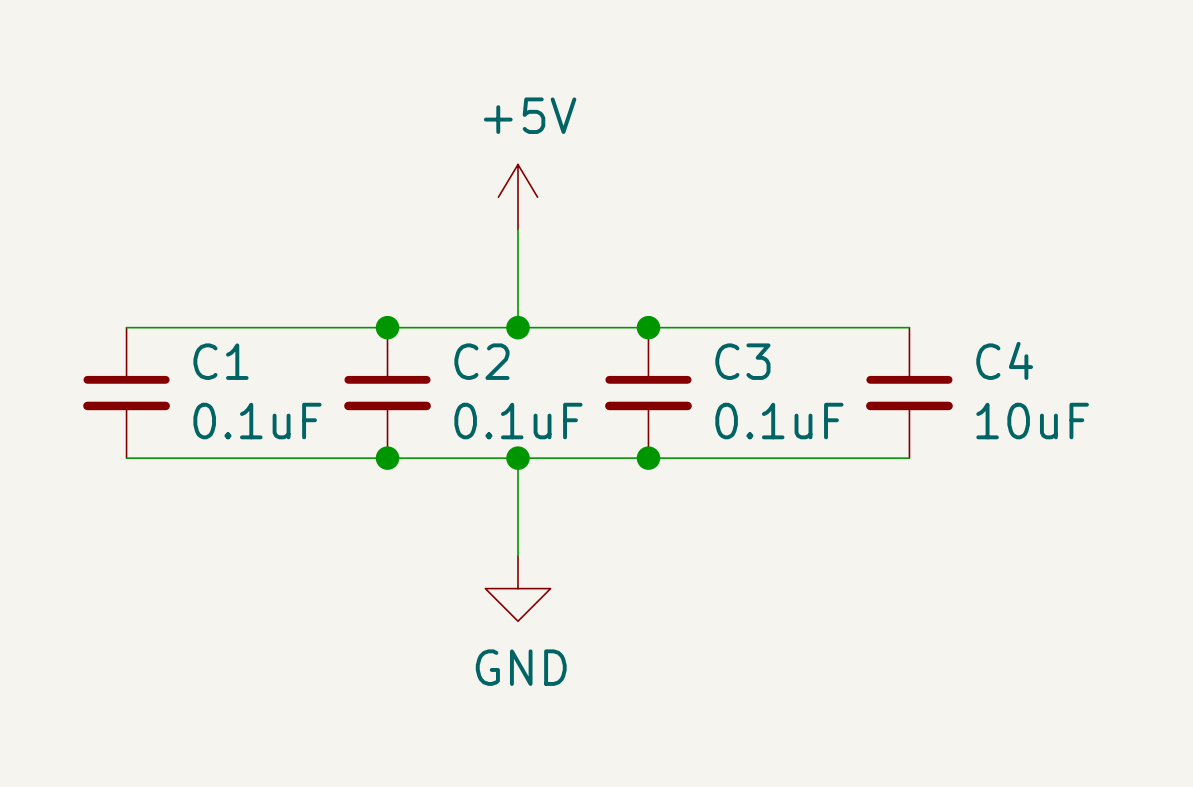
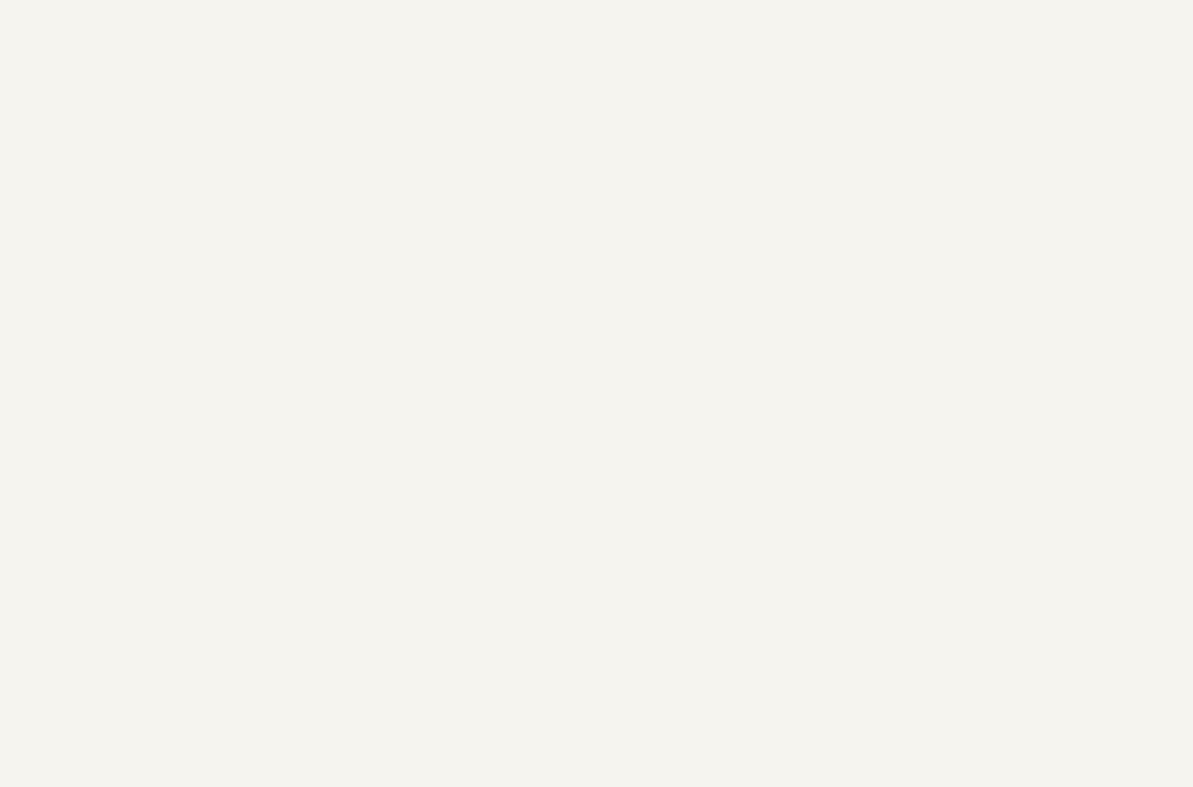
power symbol: +5V (517, 197) -> none
wire: (517, 229) (517, 327) -> none
wire: (126, 327) (909, 327) -> none
junction: (387, 327) -> none
junction: (517, 327) -> none
junction: (648, 327) -> none
C1: 0.1uF (126, 392) -> none
C2: 0.1uF (387, 392) -> none
C3: 0.1uF (648, 392) -> none
C4: 10uF (909, 392) -> none
wire: (126, 458) (909, 458) -> none
junction: (387, 458) -> none
wire: (517, 458) (517, 555) -> none
junction: (517, 458) -> none
junction: (648, 458) -> none
power symbol: GND (517, 588) -> none

